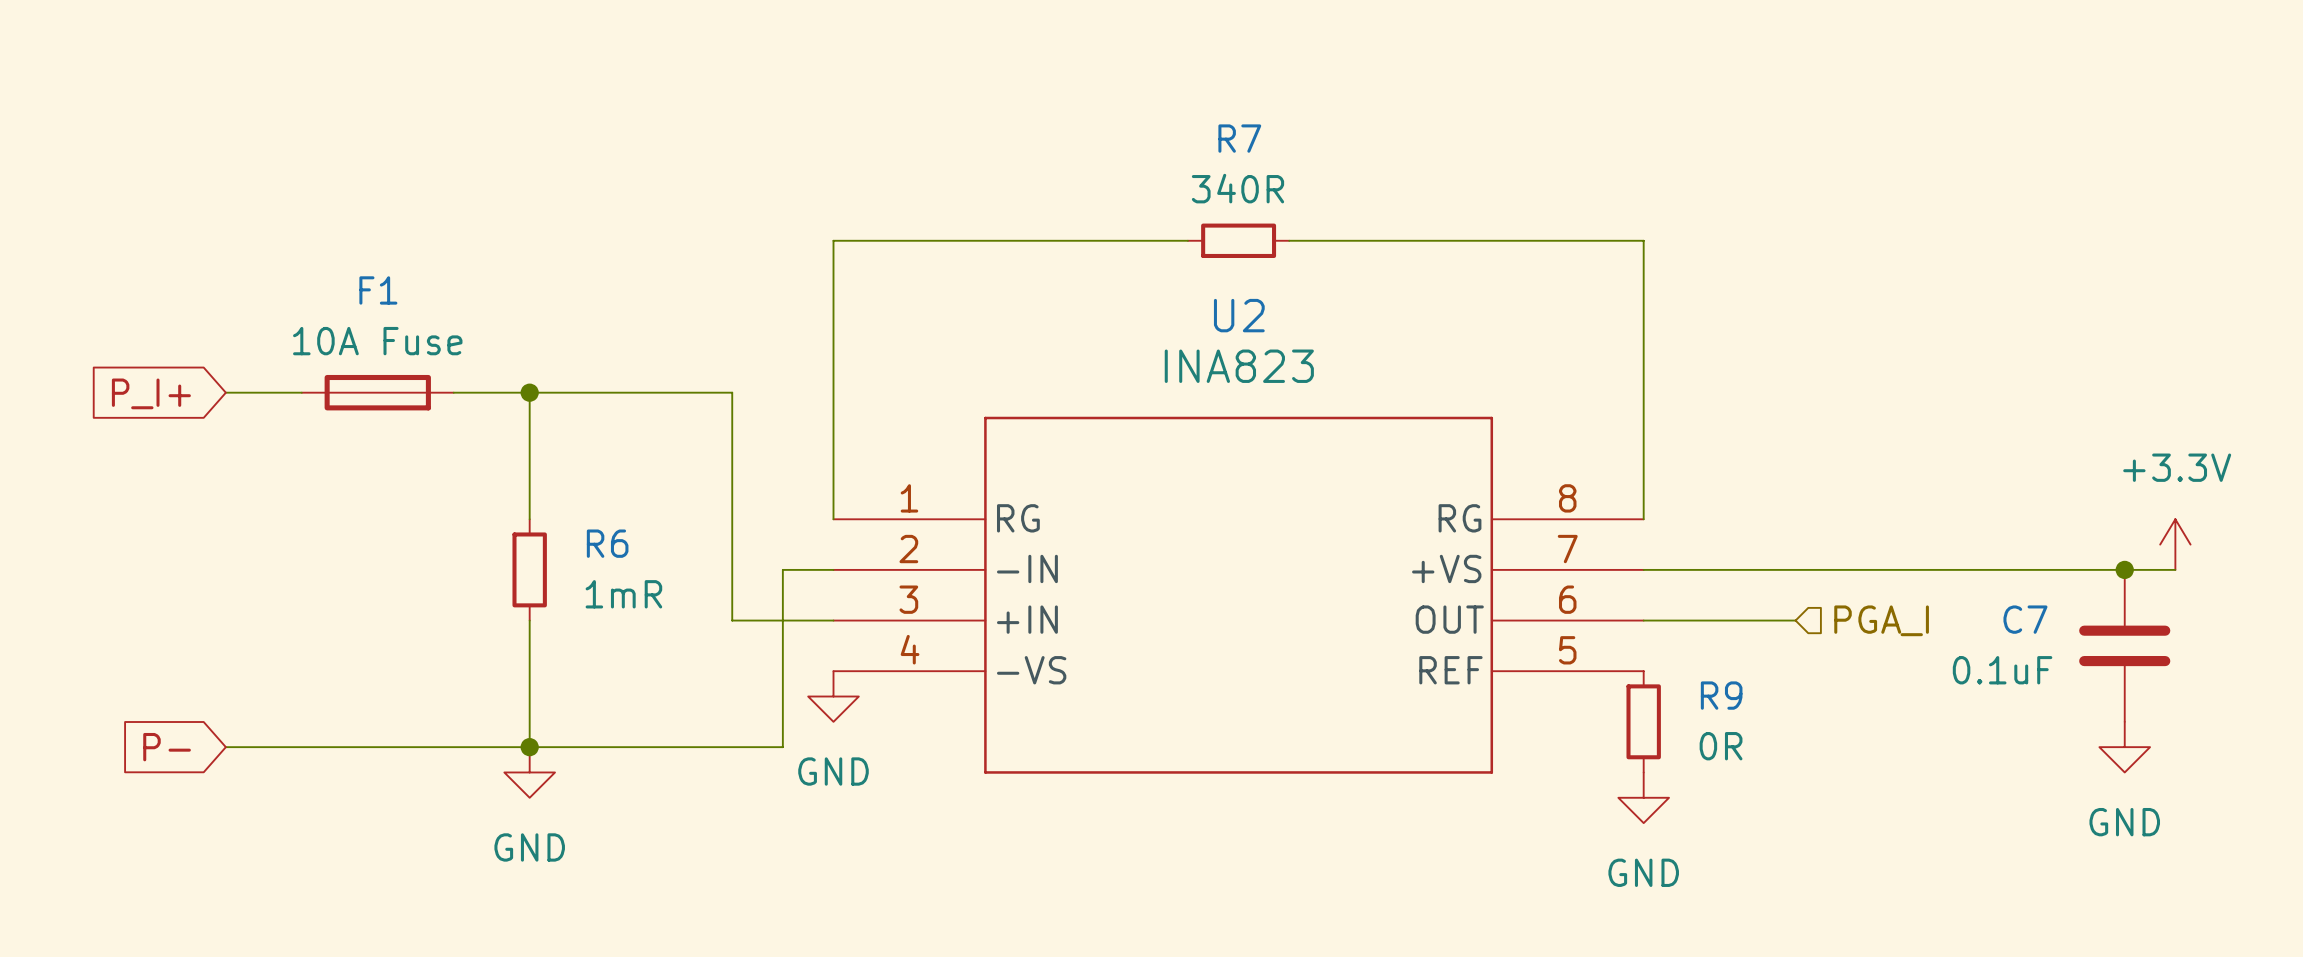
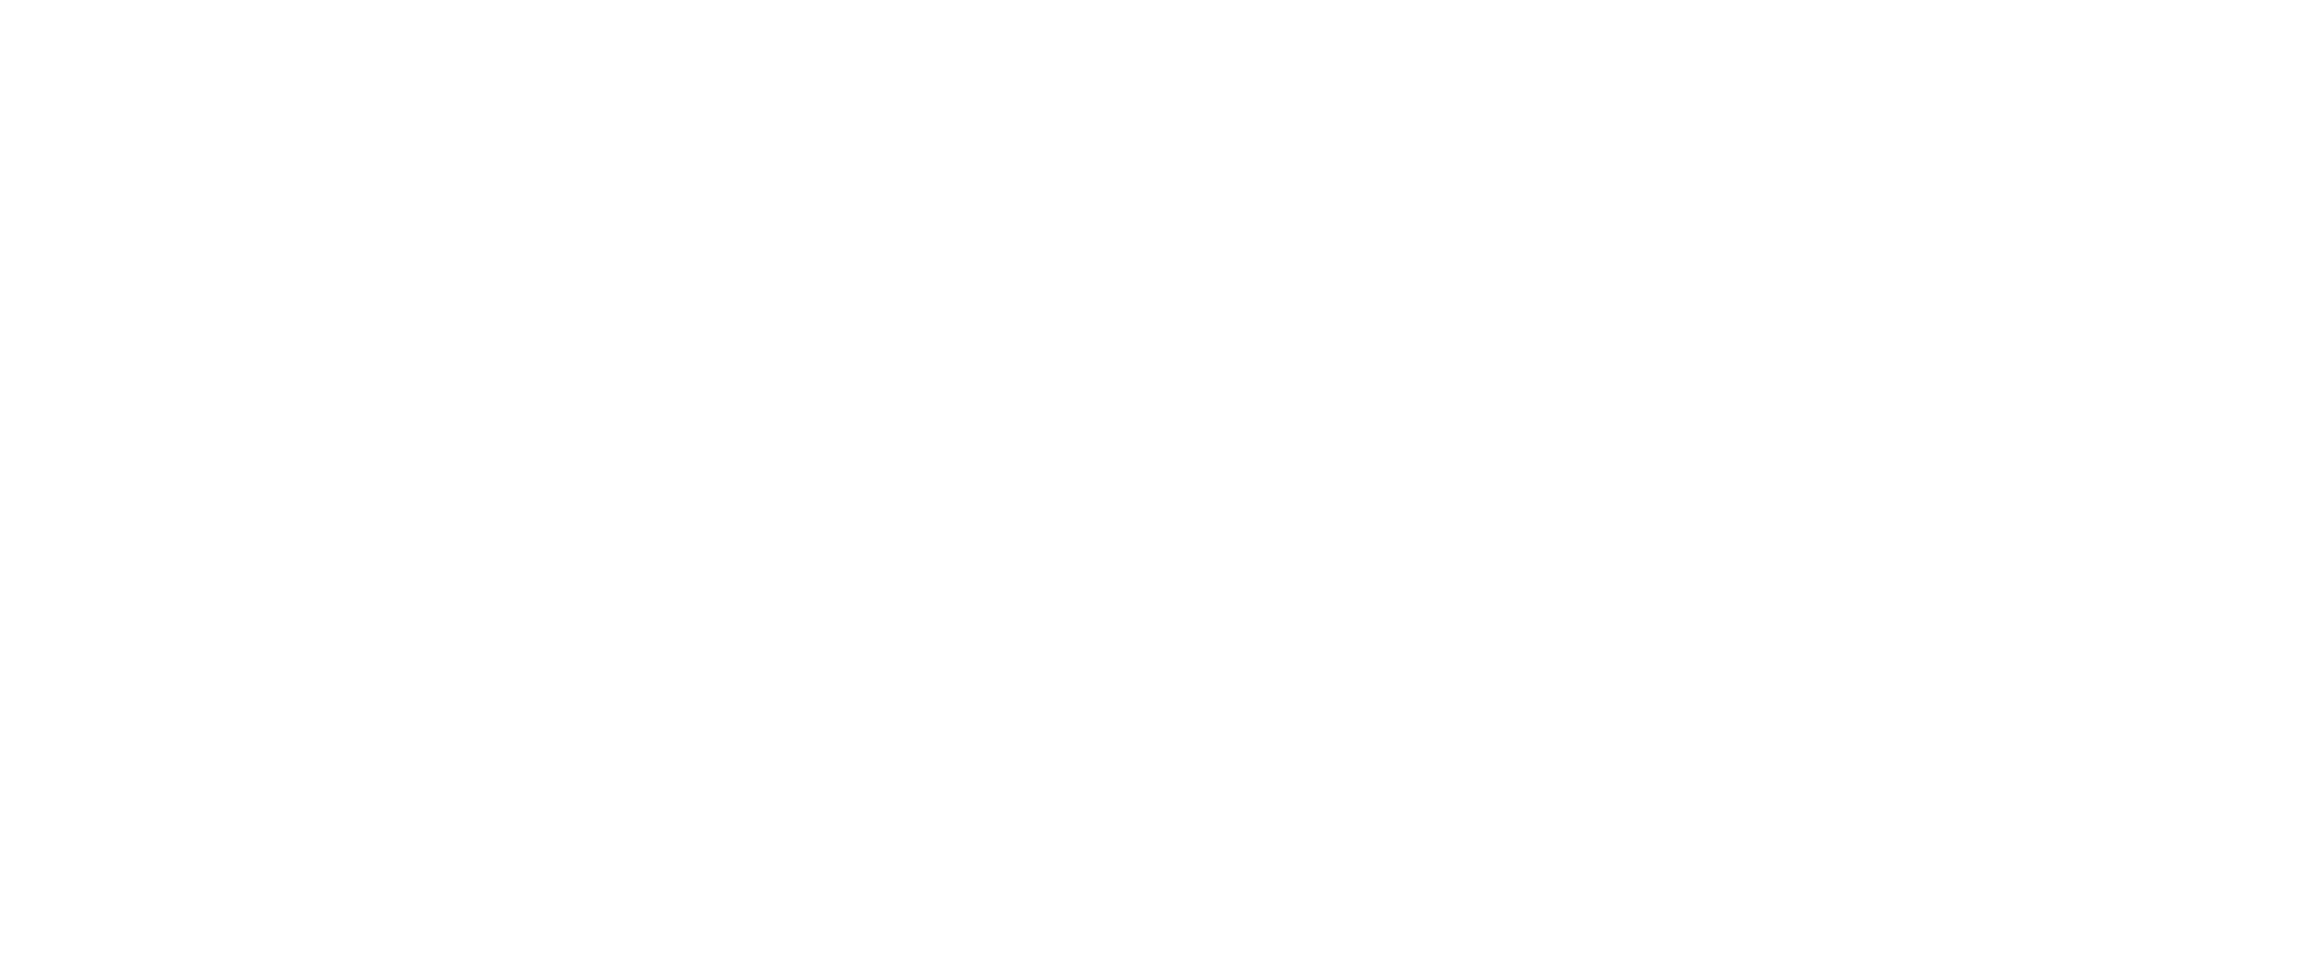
wire: (1187, 240) (833, 240) (833, 519) -> none
R7: 340R (1238, 240) -> none
wire: (1289, 240) (1643, 240) (1643, 519) -> none
wire: (225, 392) (301, 392) -> none
F1: 10A Fuse (377, 392) -> none
wire: (453, 392) (732, 392) (732, 620) (833, 620) -> none
wire: (529, 392) (529, 519) -> none
junction: (529, 392) -> none
global label: P_I+ (151, 393) -> none
power symbol: +3.3V (2175, 544) -> none
R6: 1mR (529, 569) -> none
wire: (833, 569) (782, 569) (782, 747) (225, 747) -> none
wire: (1643, 569) (2175, 569) -> none
junction: (2124, 569) -> none
U2: INA823 (1238, 595) -> none
wire: (529, 620) (529, 747) -> none
wire: (1643, 620) (1795, 620) -> none
hierarchical label: PGA_I (1881, 620) -> none
C7: 0.1uF (2124, 645) -> none
power symbol: GND (833, 696) -> none
R9: 0R (1643, 721) -> none
global label: P- (167, 747) -> none
junction: (529, 747) -> none
power symbol: GND (2124, 747) -> none
power symbol: GND (529, 772) -> none
power symbol: GND (1643, 797) -> none

